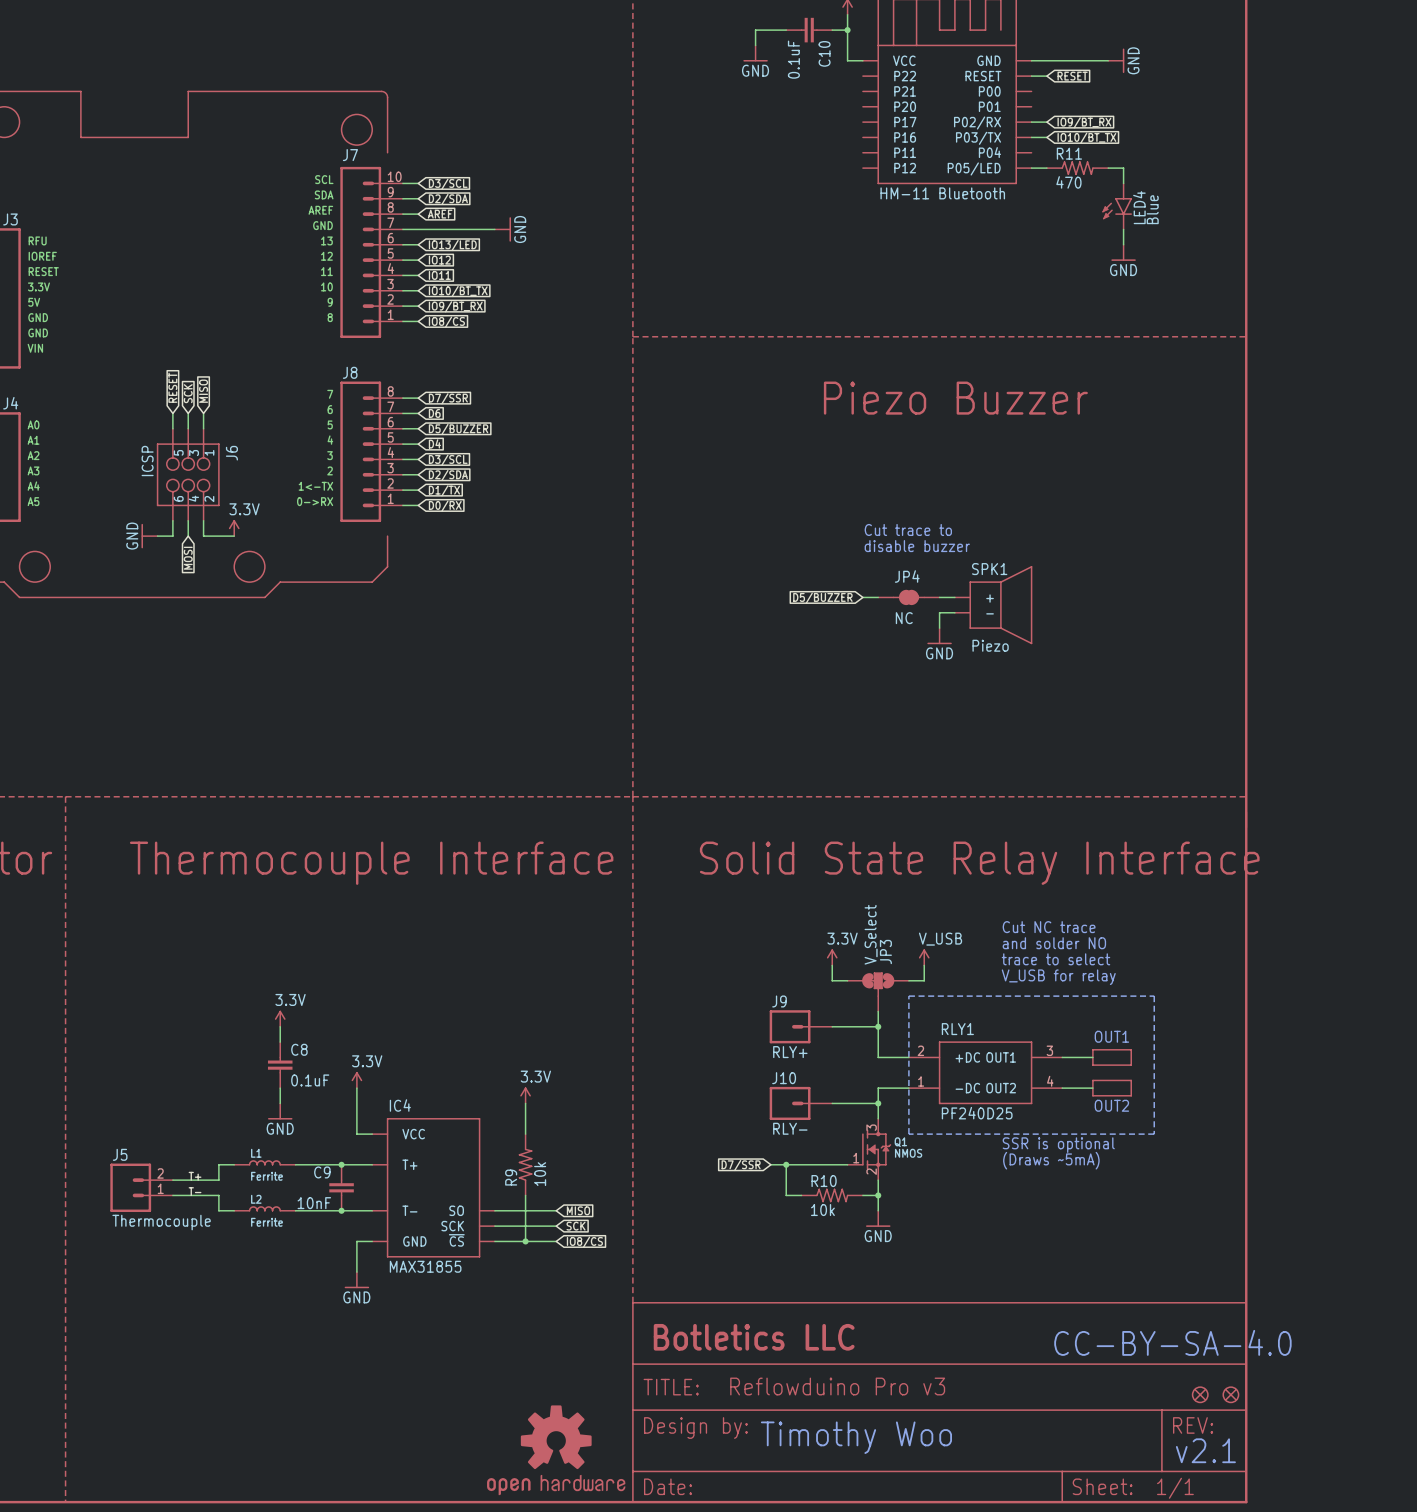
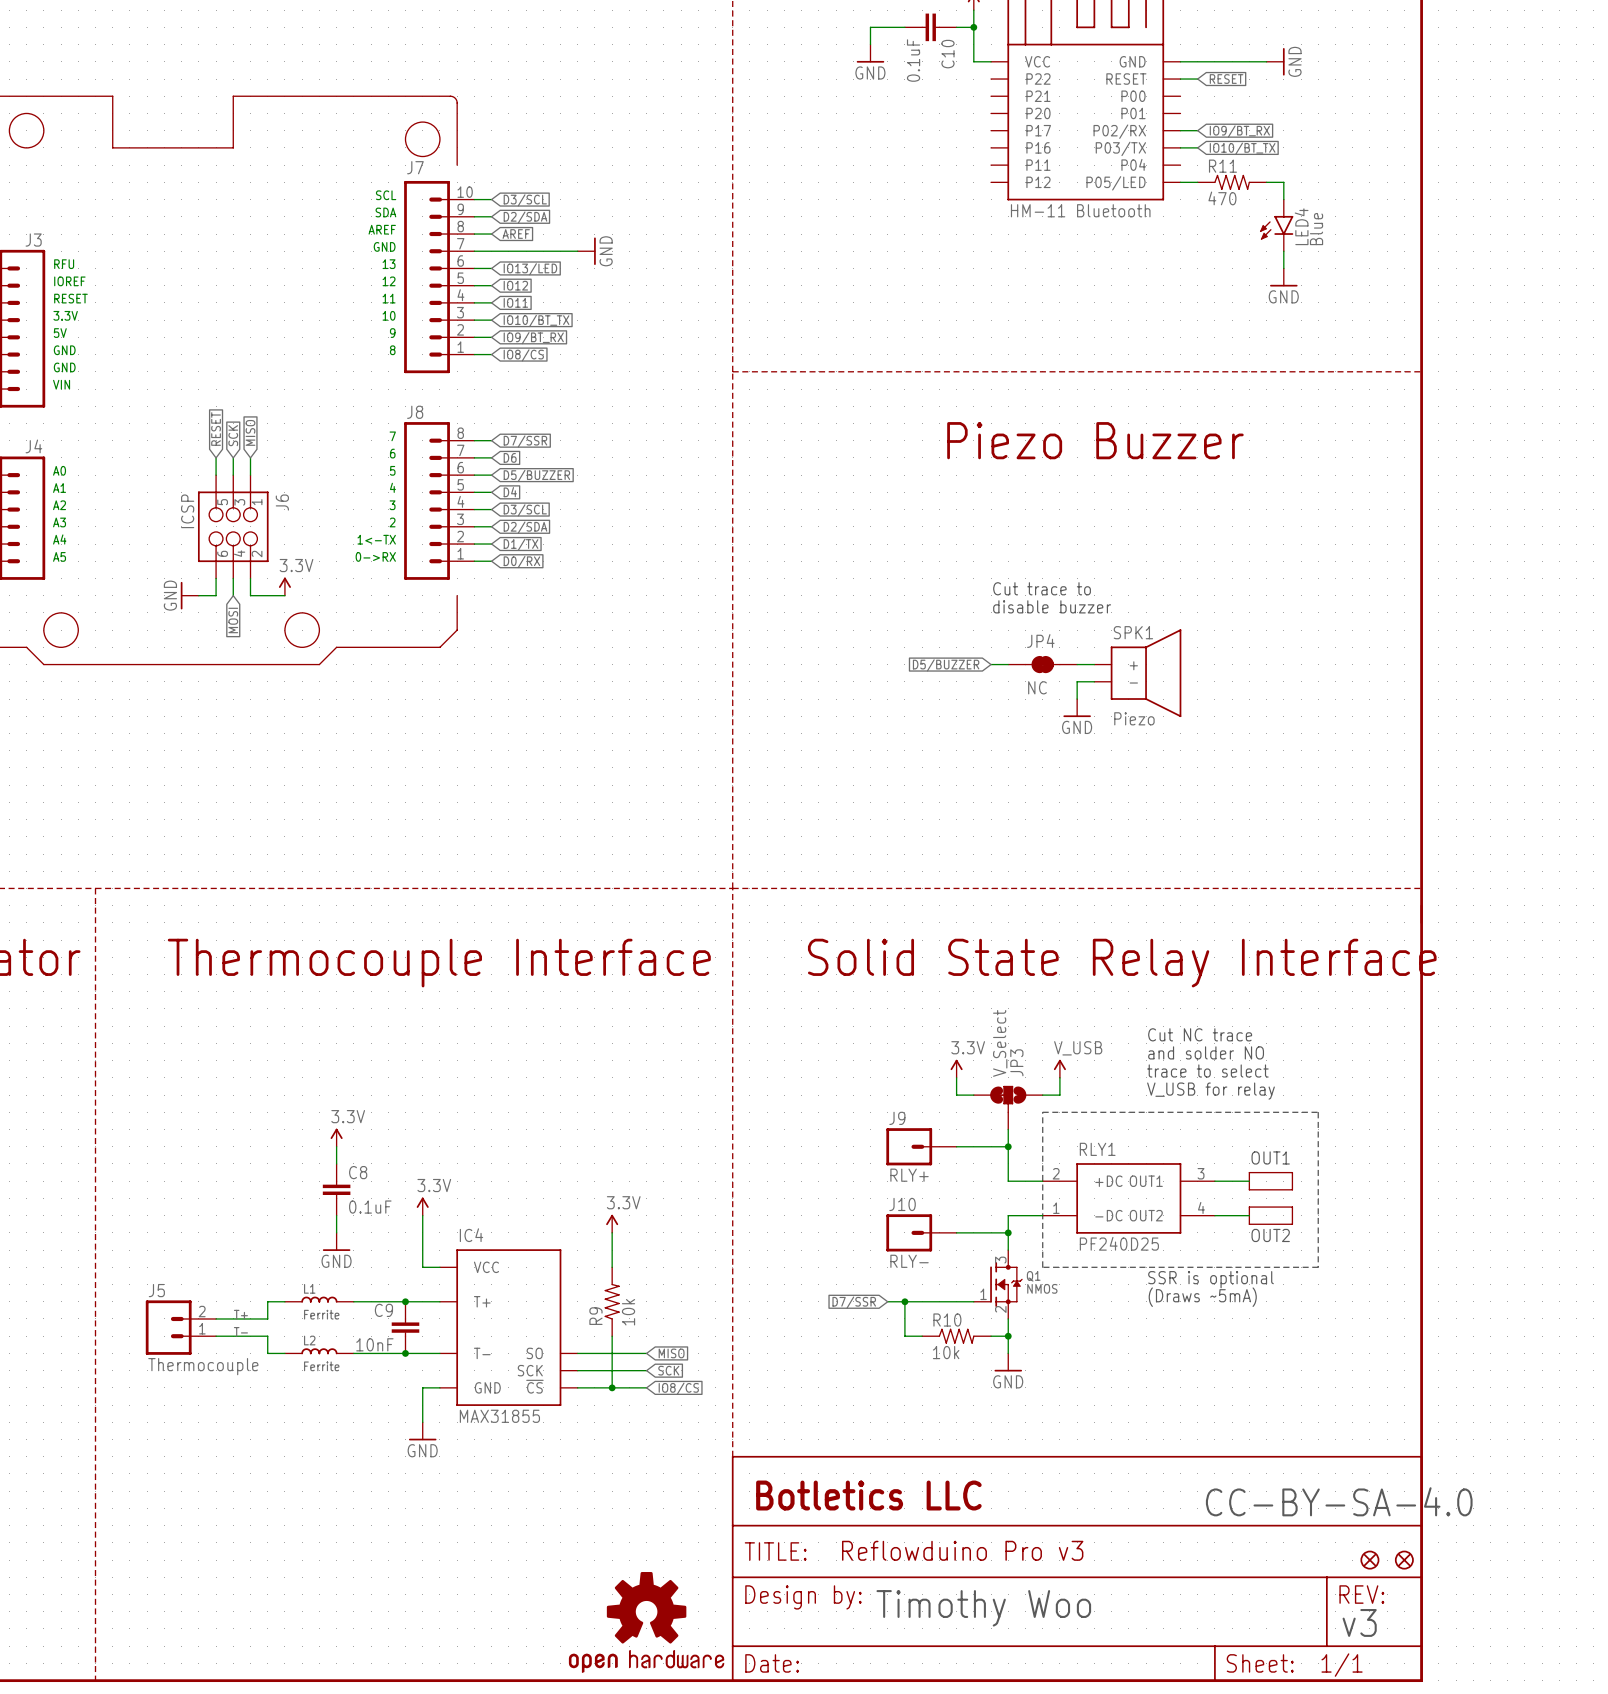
text: v2.1 (1205, 1450) -> v3 (1359, 1622)

